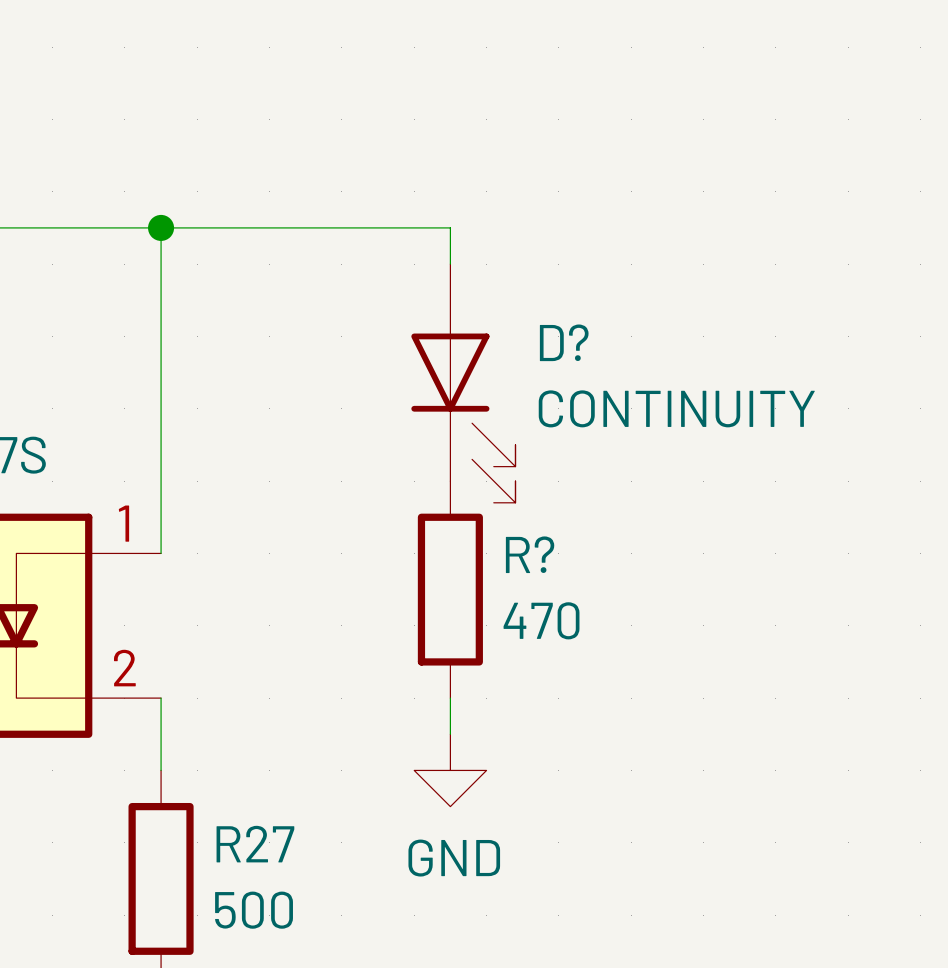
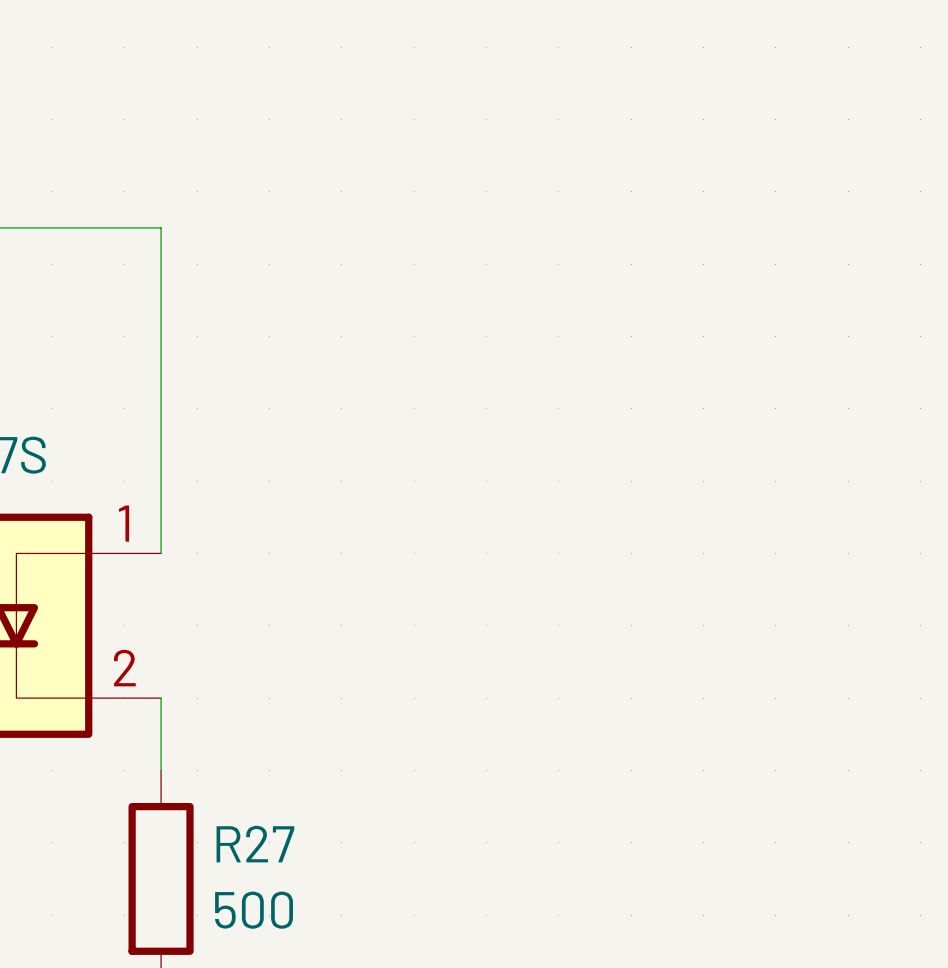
wire: (161, 227) (450, 227) (450, 264) -> none
junction: (161, 227) -> none
D?: CONTINUITY (463, 383) -> none
R?: 470 (450, 589) -> none
wire: (450, 698) (450, 734) -> none
power symbol: GND (450, 770) -> none

